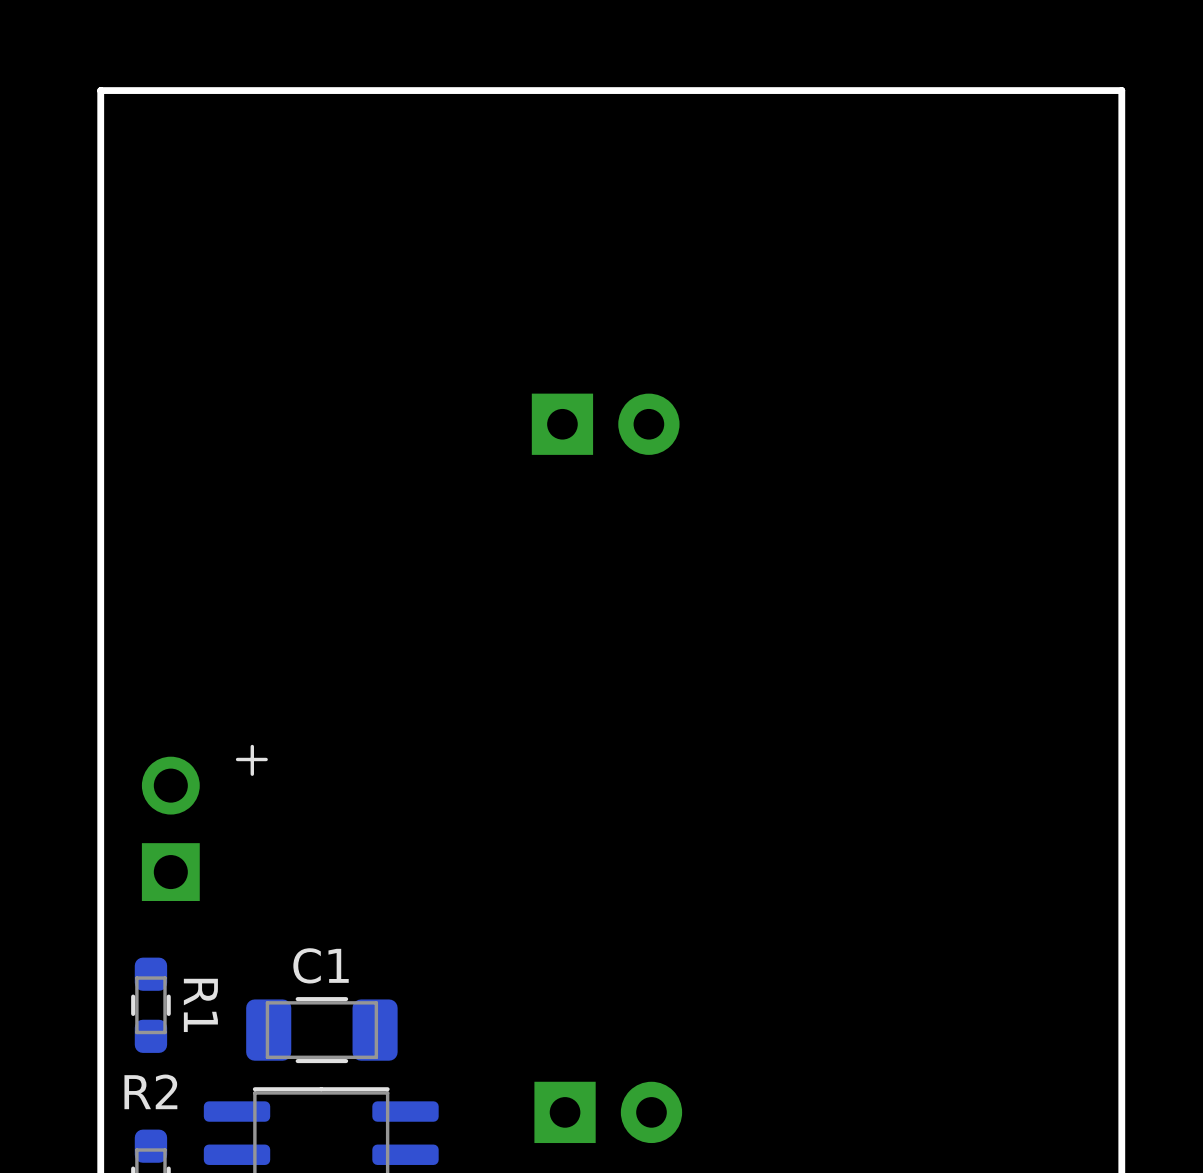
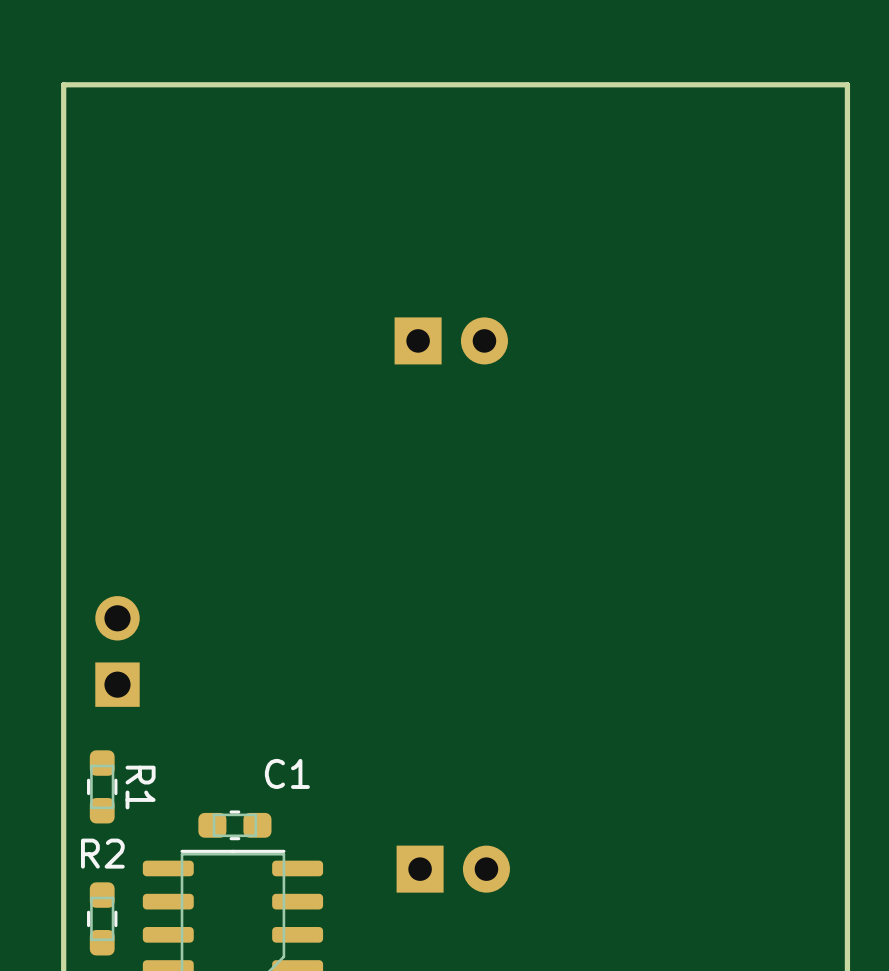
line: (252, 746) (252, 774) -> none
line: (266, 759) (237, 759) -> none
C1 name position: C1 (321, 965) -> C1 (287, 773)
C1 footprint: [246, 997, 398, 1064] -> [198, 810, 272, 841]

